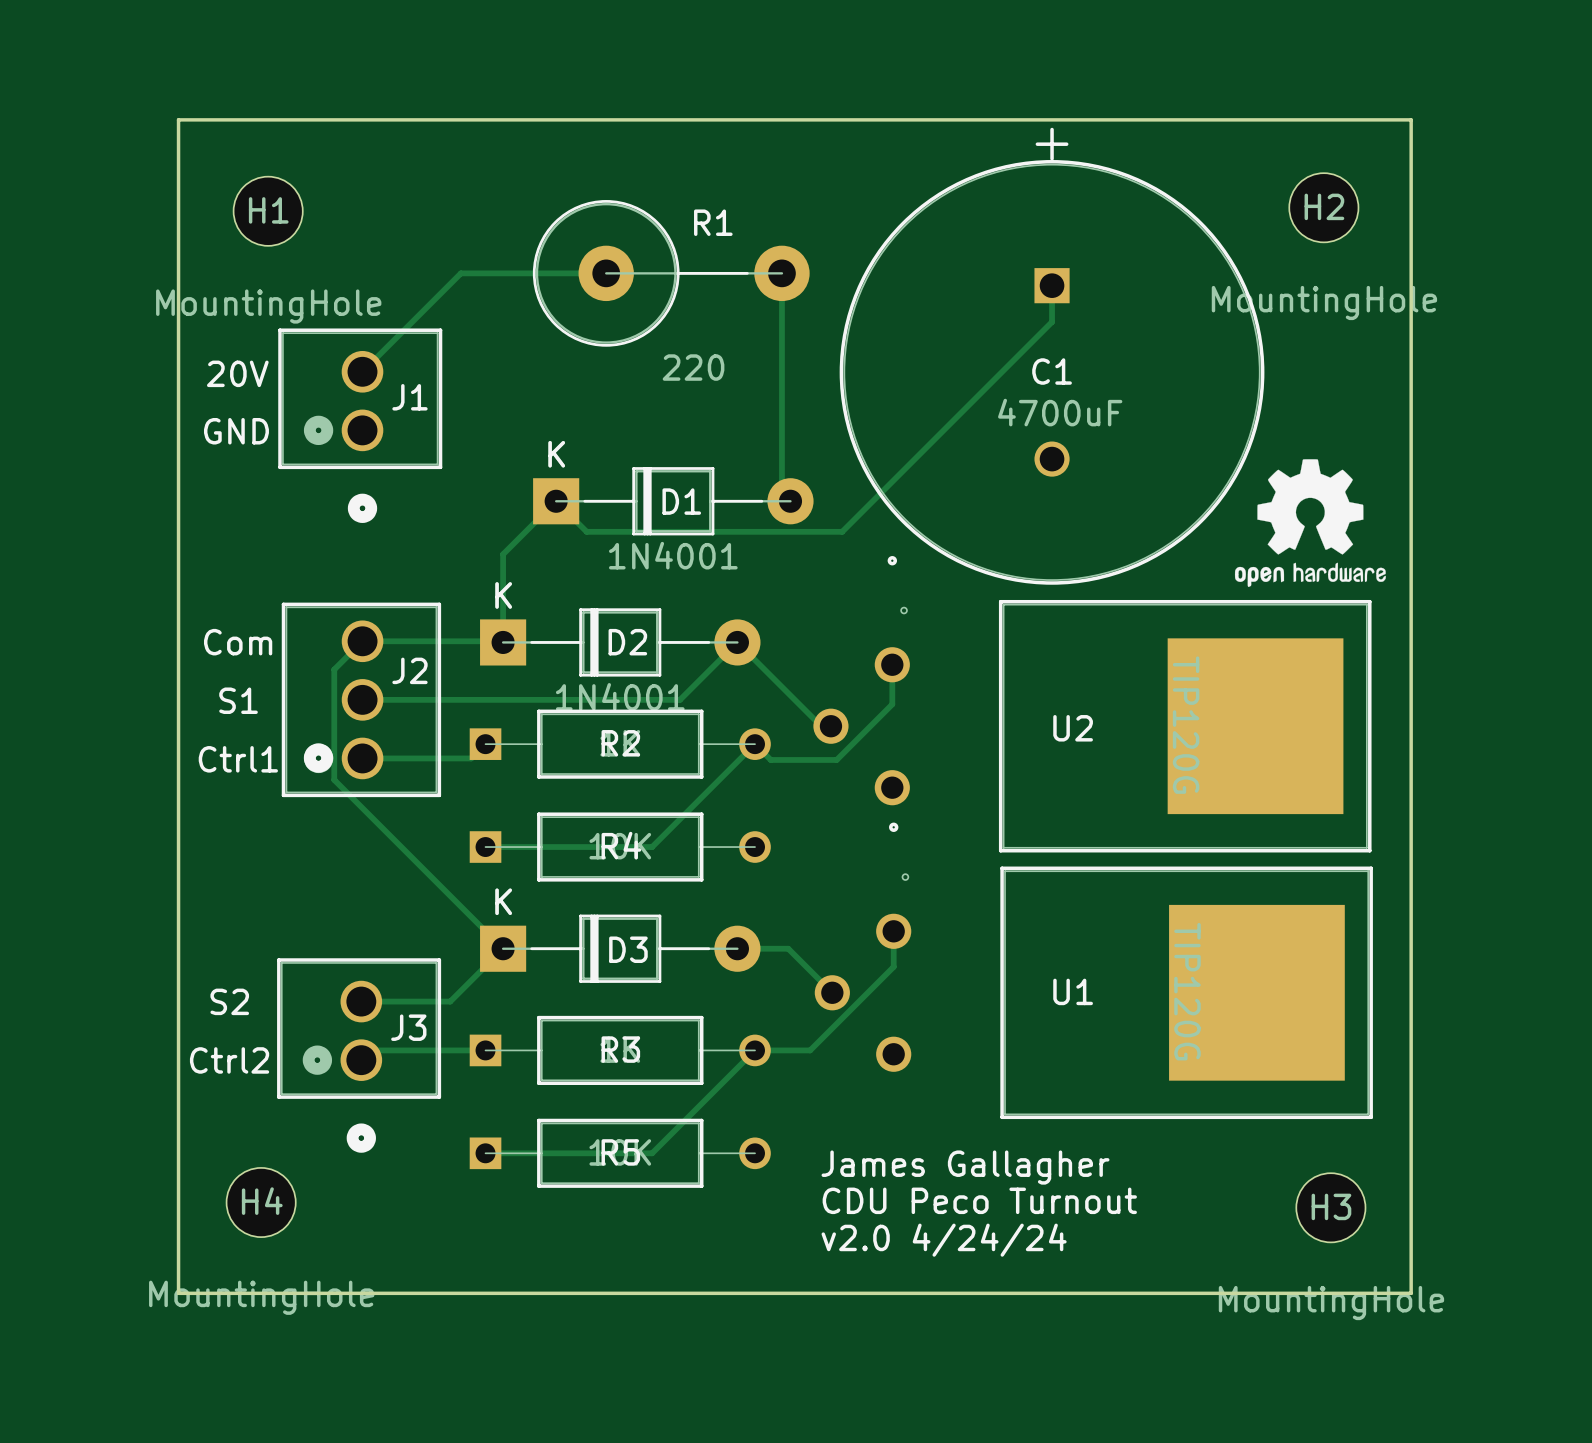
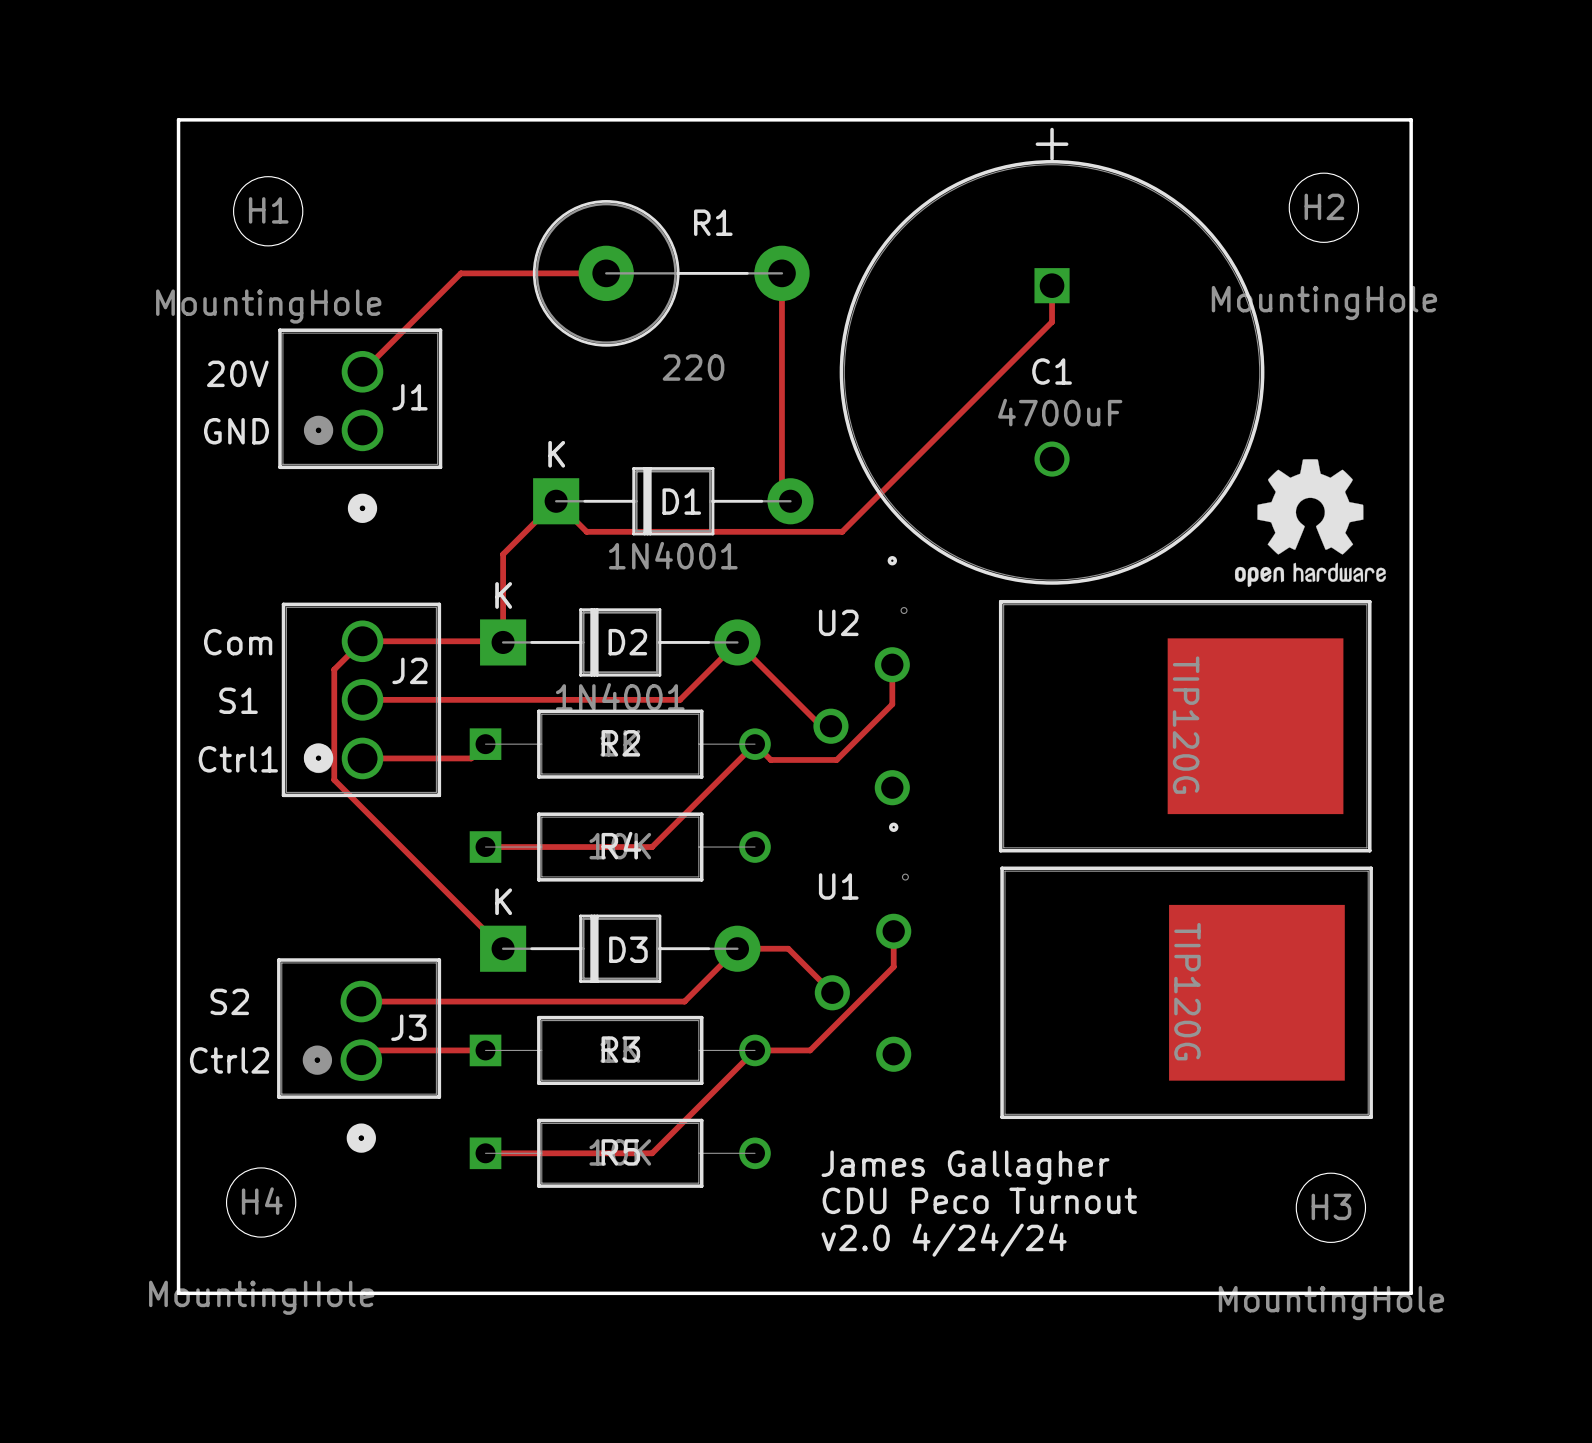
U2 name position: U2 (1073, 728) -> U2 (838, 622)
track: (503, 948) (450, 1001) -> (737, 948) (684, 1001) (450, 1001)
U1 name position: U1 (1073, 991) -> U1 (838, 886)

